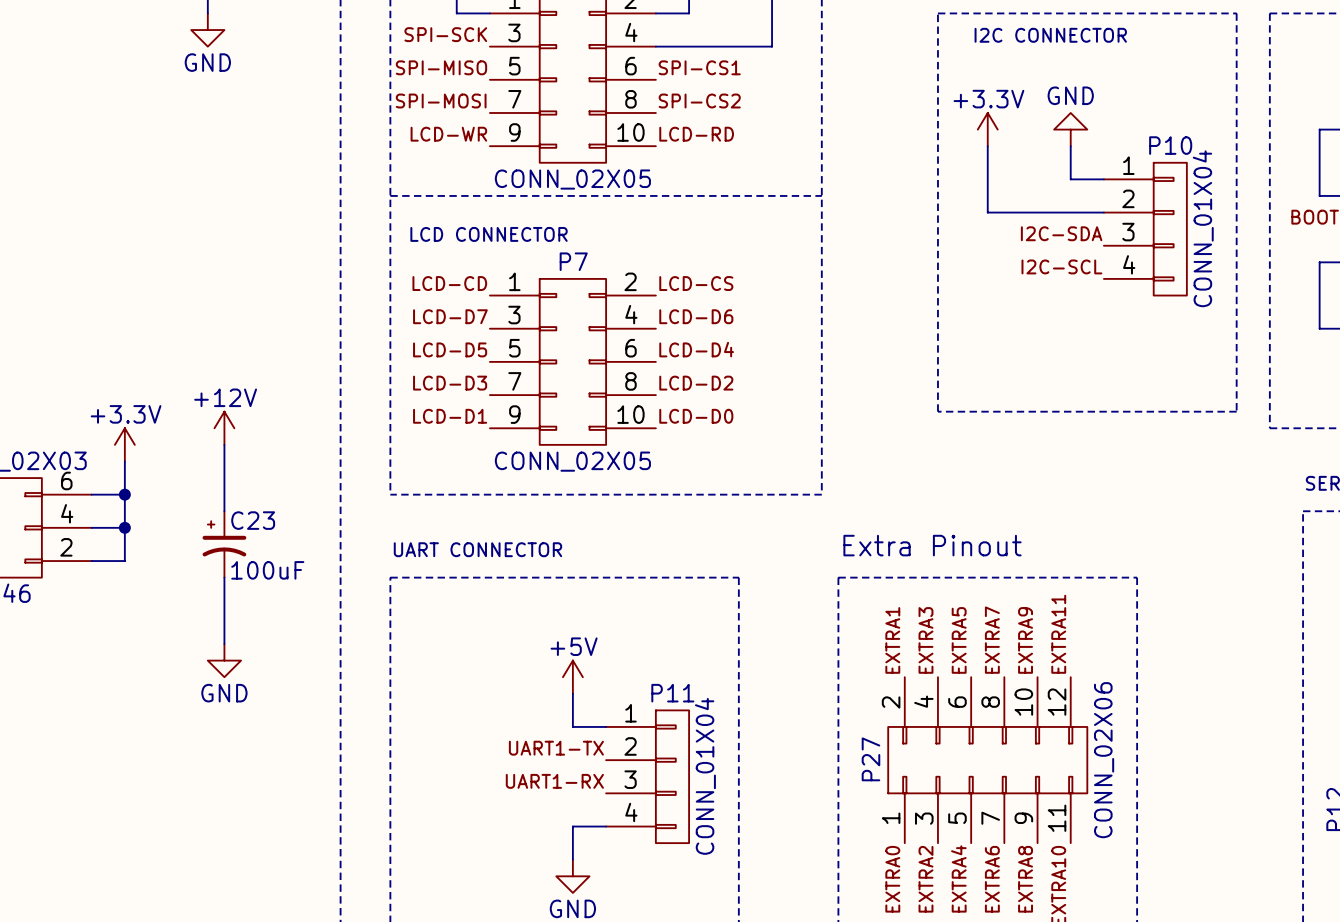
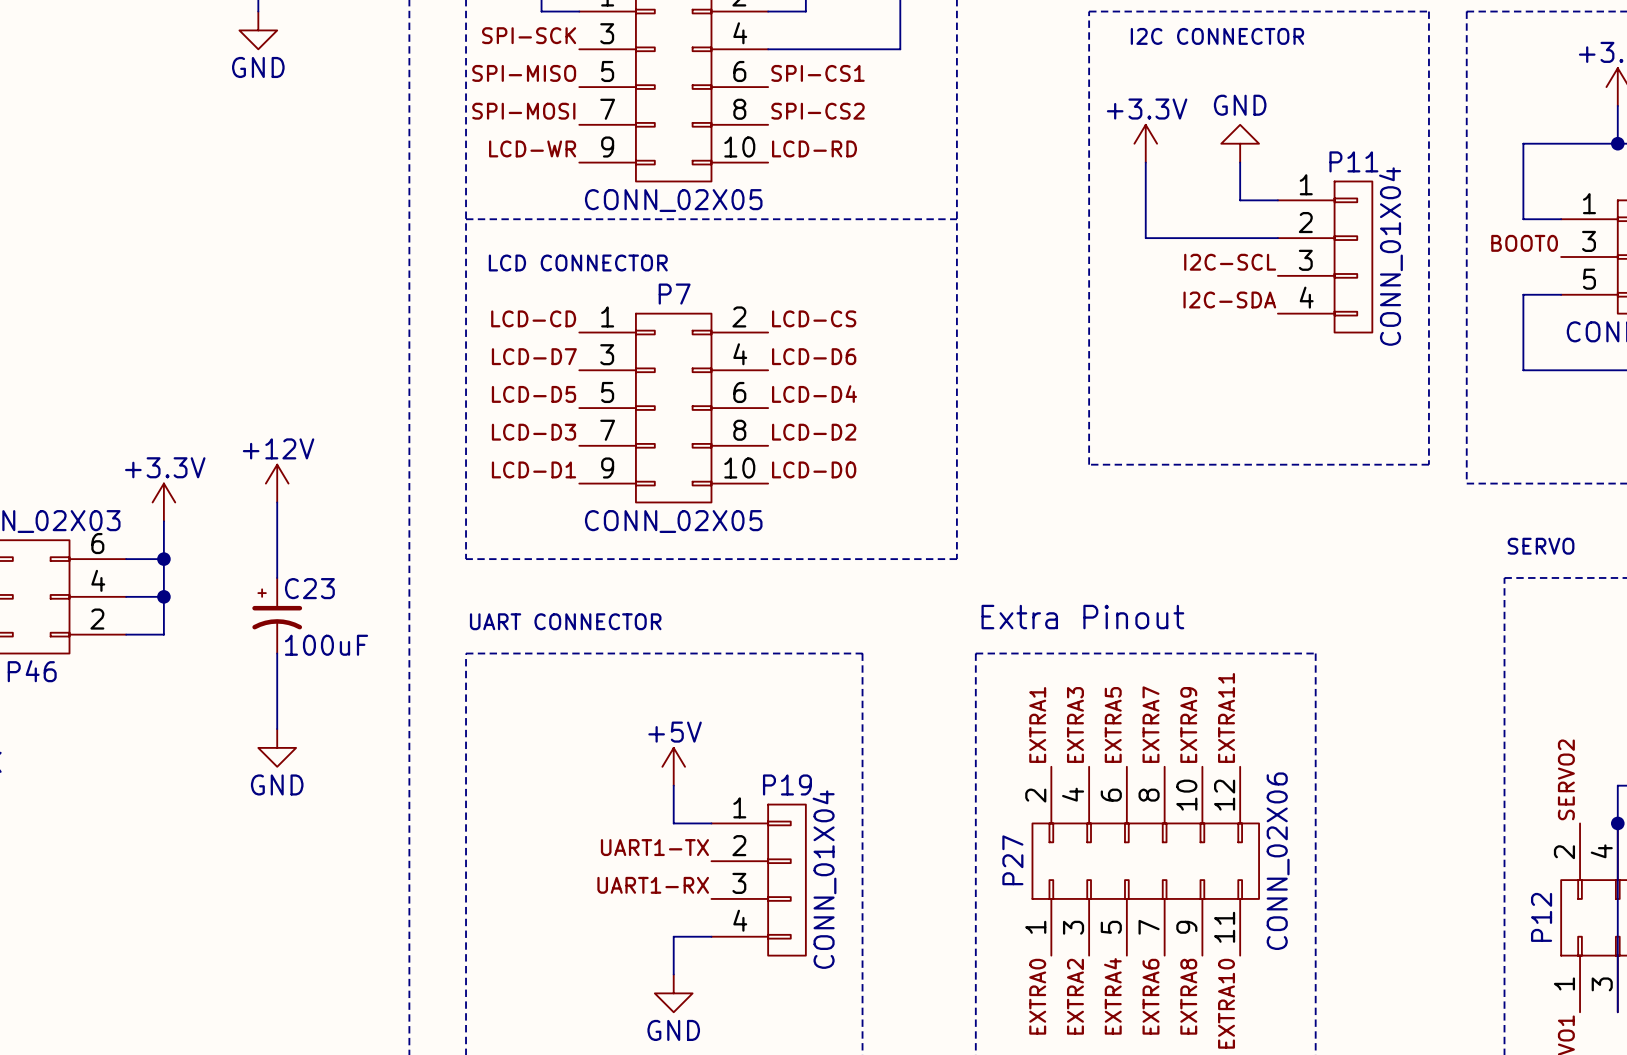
P10 name: P10 (1170, 145) -> P11 (1353, 161)
label: I2C-SDA (1061, 233) -> I2C-SCL (1230, 262)
label: I2C-SCL (1061, 266) -> I2C-SDA (1229, 300)
P11 name: P11 (672, 693) -> P19 (787, 784)

